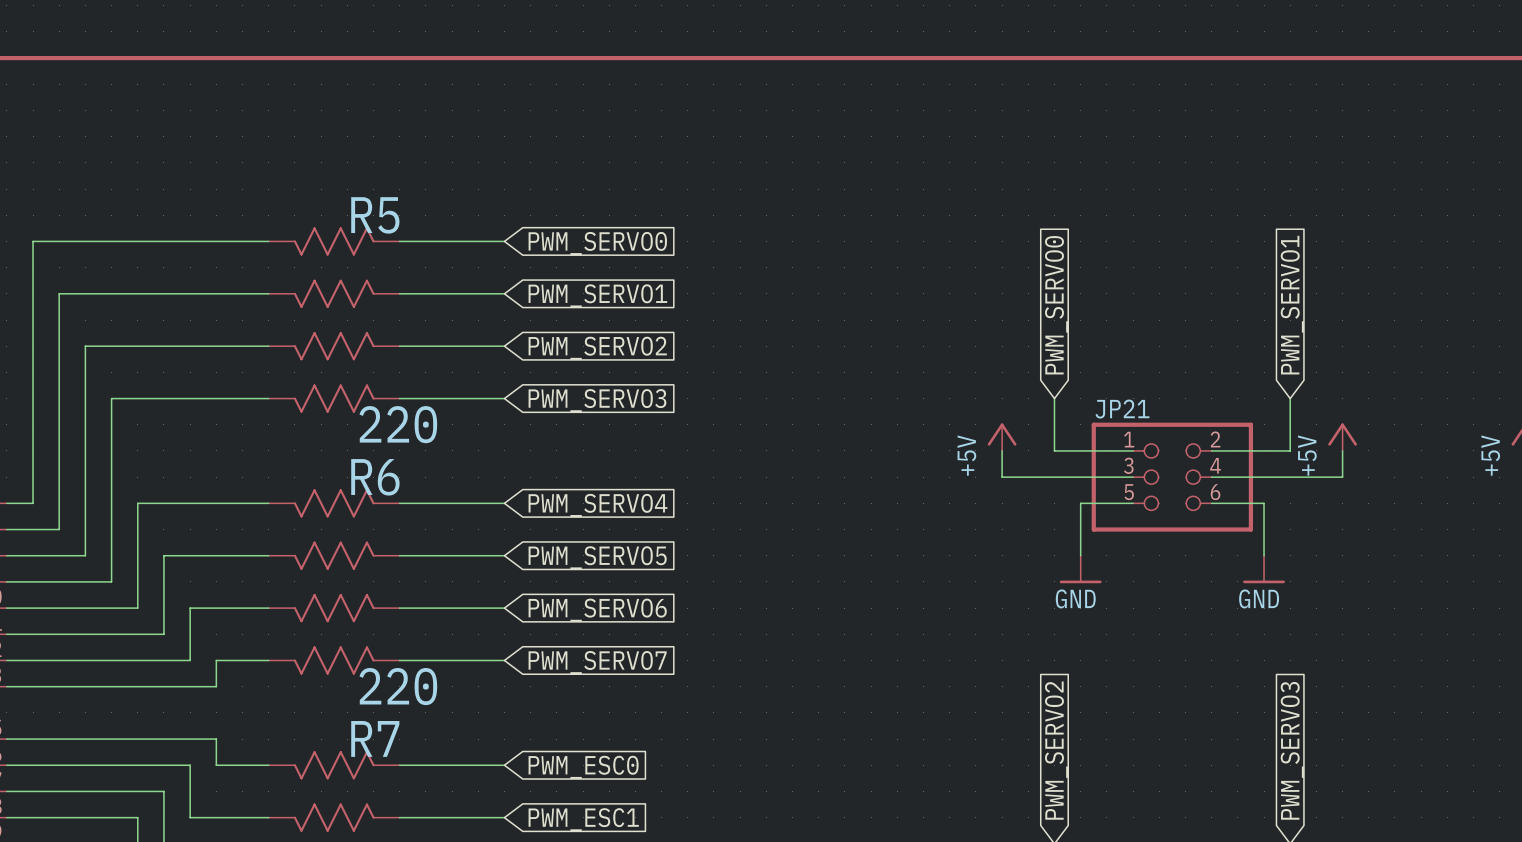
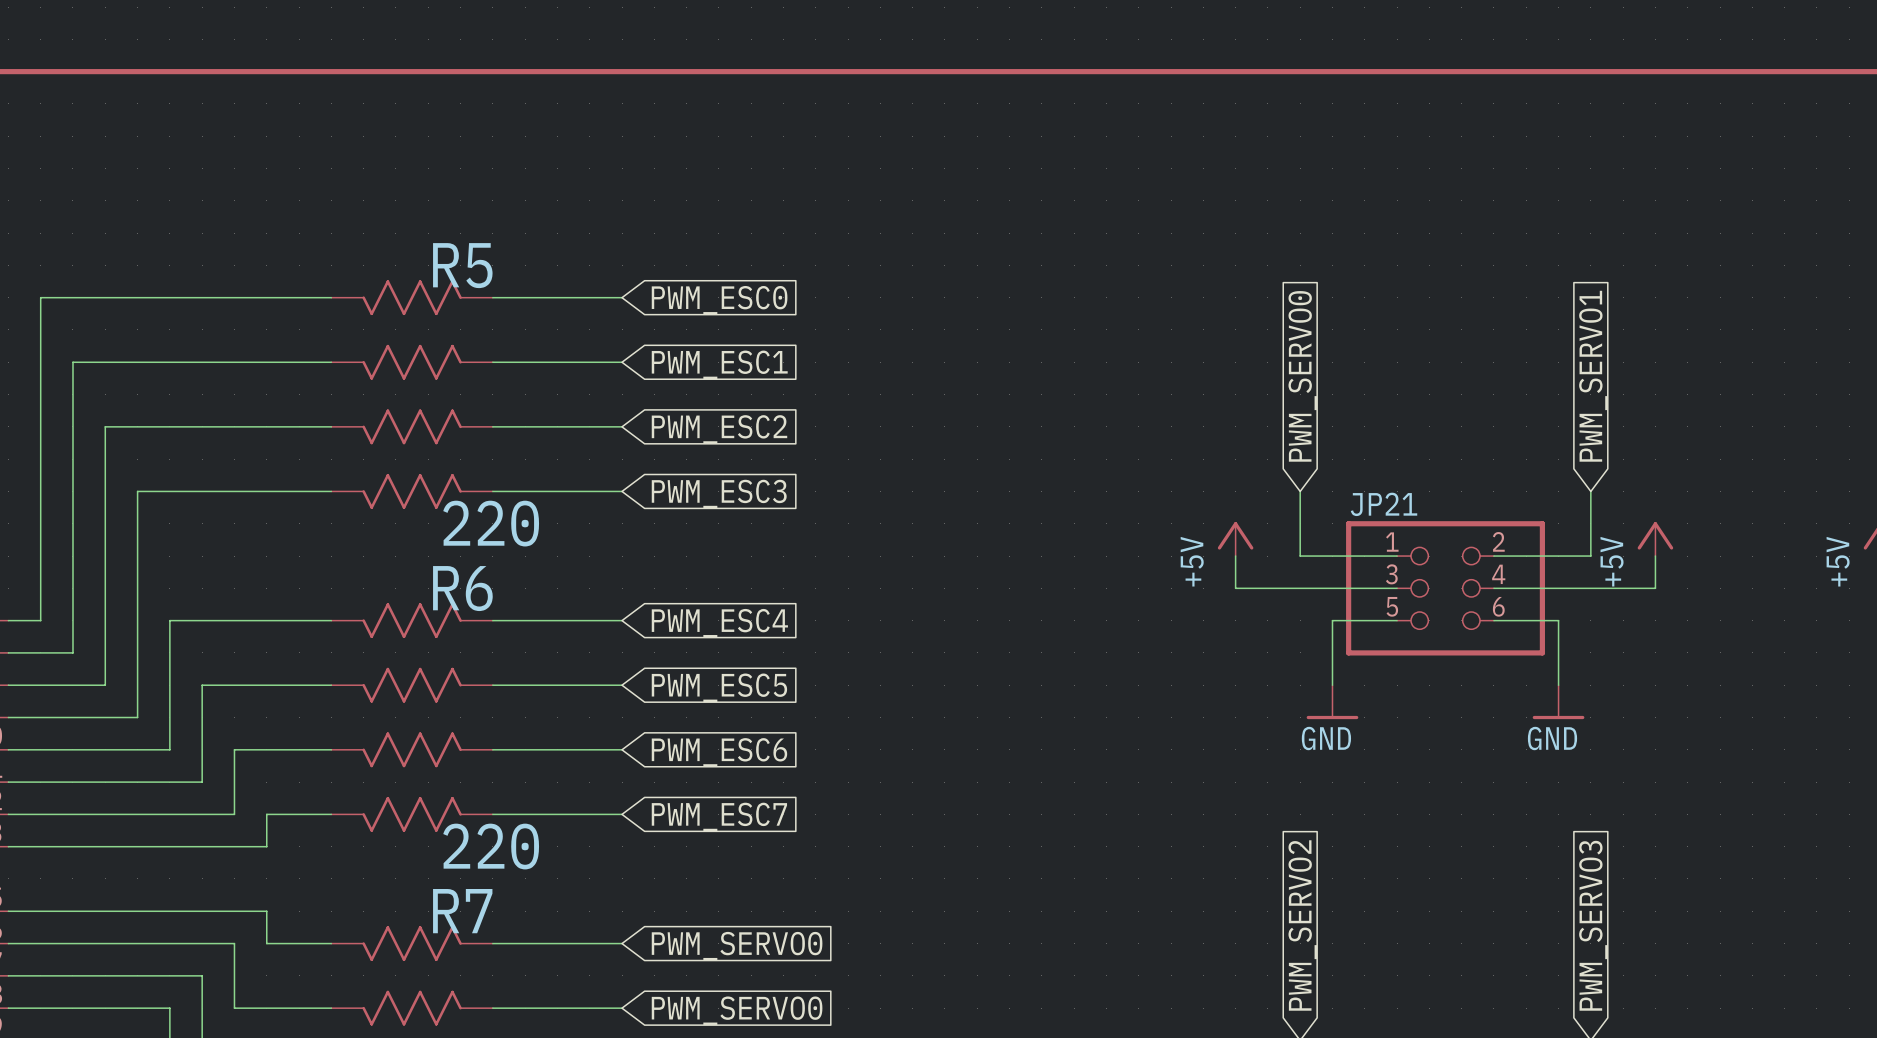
global label: PWM_SERVO0 (597, 243) -> PWM_ESC0 (719, 300)
global label: PWM_SERVO1 (597, 295) -> PWM_ESC1 (719, 364)
global label: PWM_SERVO2 (597, 348) -> PWM_ESC2 (719, 429)
global label: PWM_SERVO3 (597, 400) -> PWM_ESC3 (719, 493)
global label: PWM_SERVO4 (597, 505) -> PWM_ESC4 (719, 623)
global label: PWM_SERVO5 (597, 557) -> PWM_ESC5 (719, 687)
global label: PWM_SERVO6 (597, 610) -> PWM_ESC6 (719, 752)
global label: PWM_SERVO7 (597, 662) -> PWM_ESC7 (719, 816)
global label: PWM_ESC0 (583, 767) -> PWM_SERVO0 (737, 946)
global label: PWM_ESC1 (583, 819) -> PWM_SERVO0 (737, 1010)

